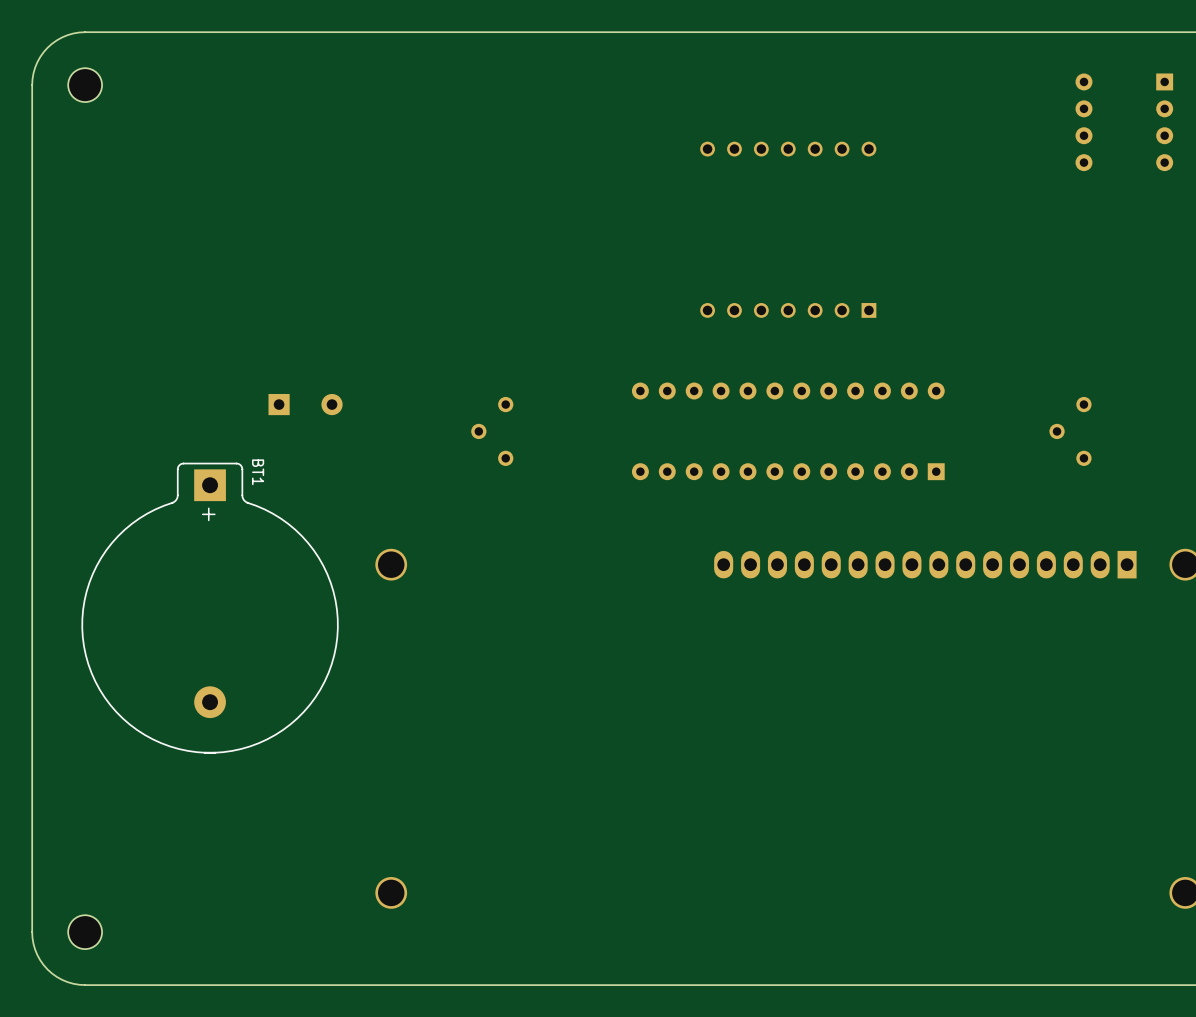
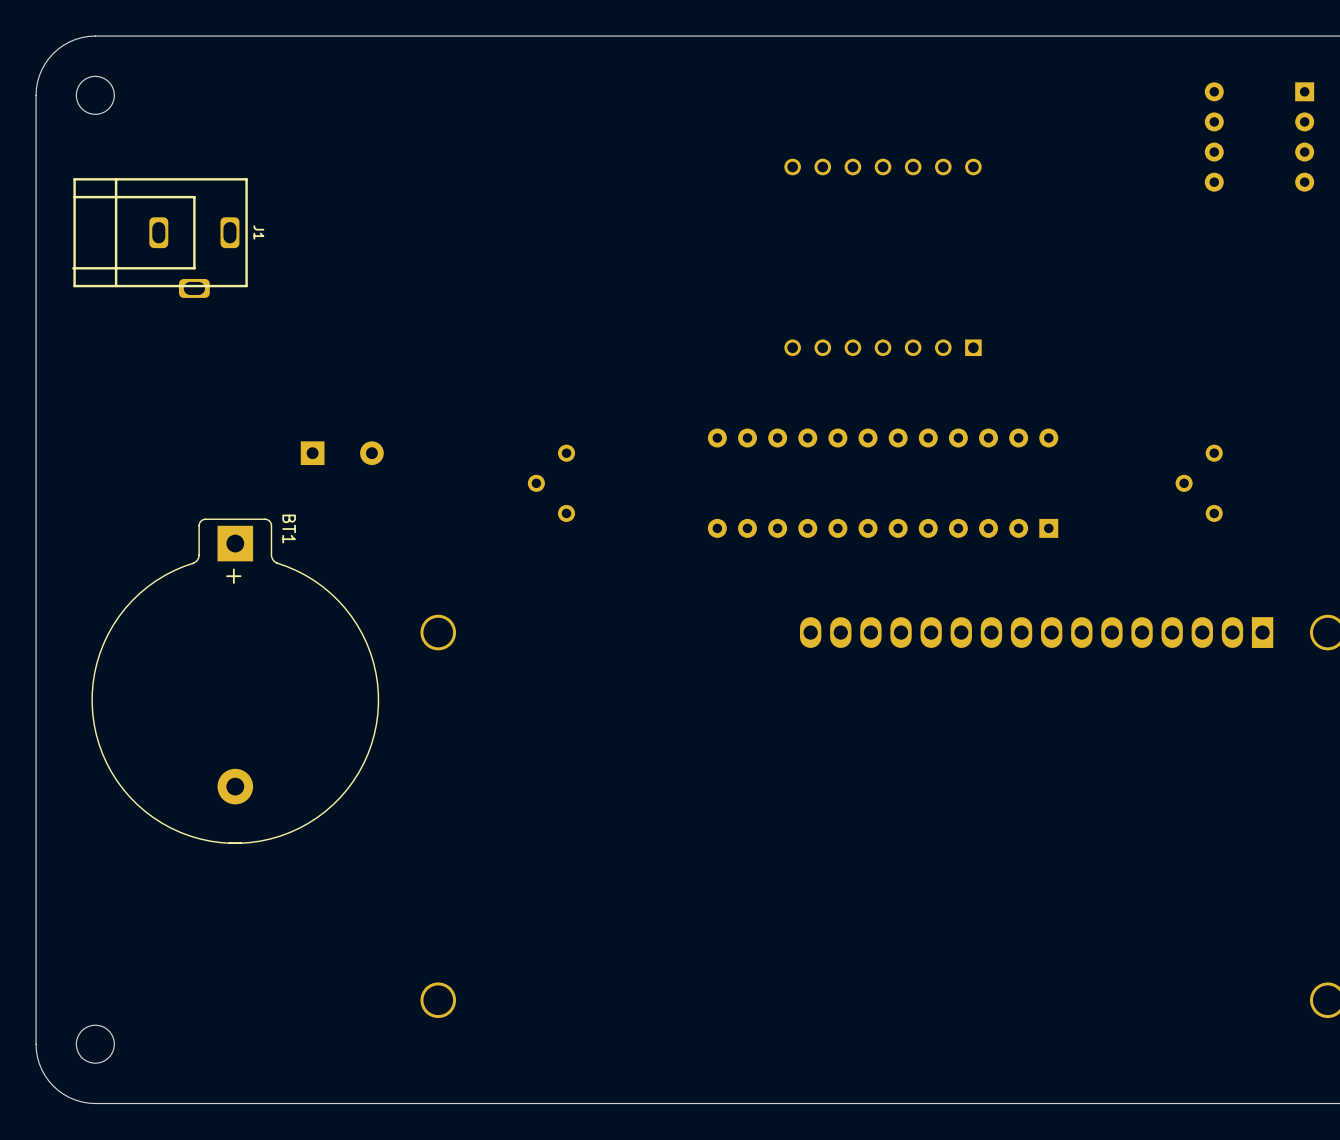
J1: none -> (159, 238)

